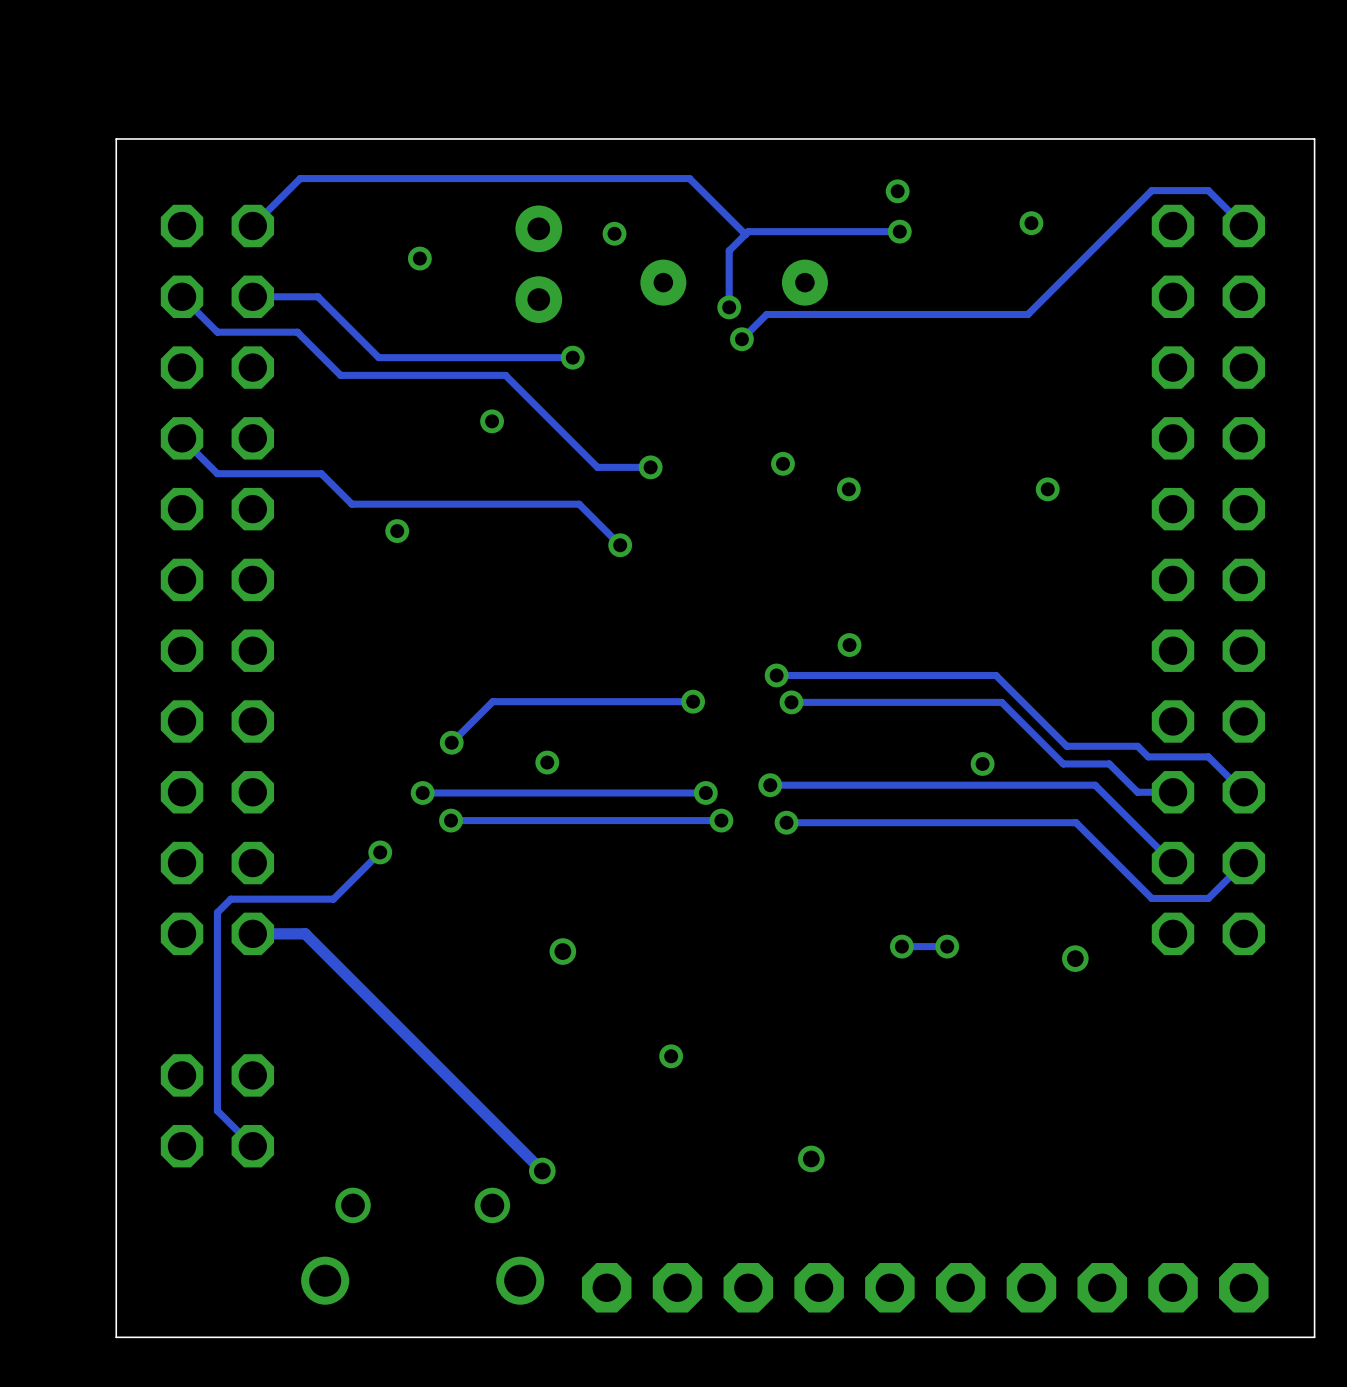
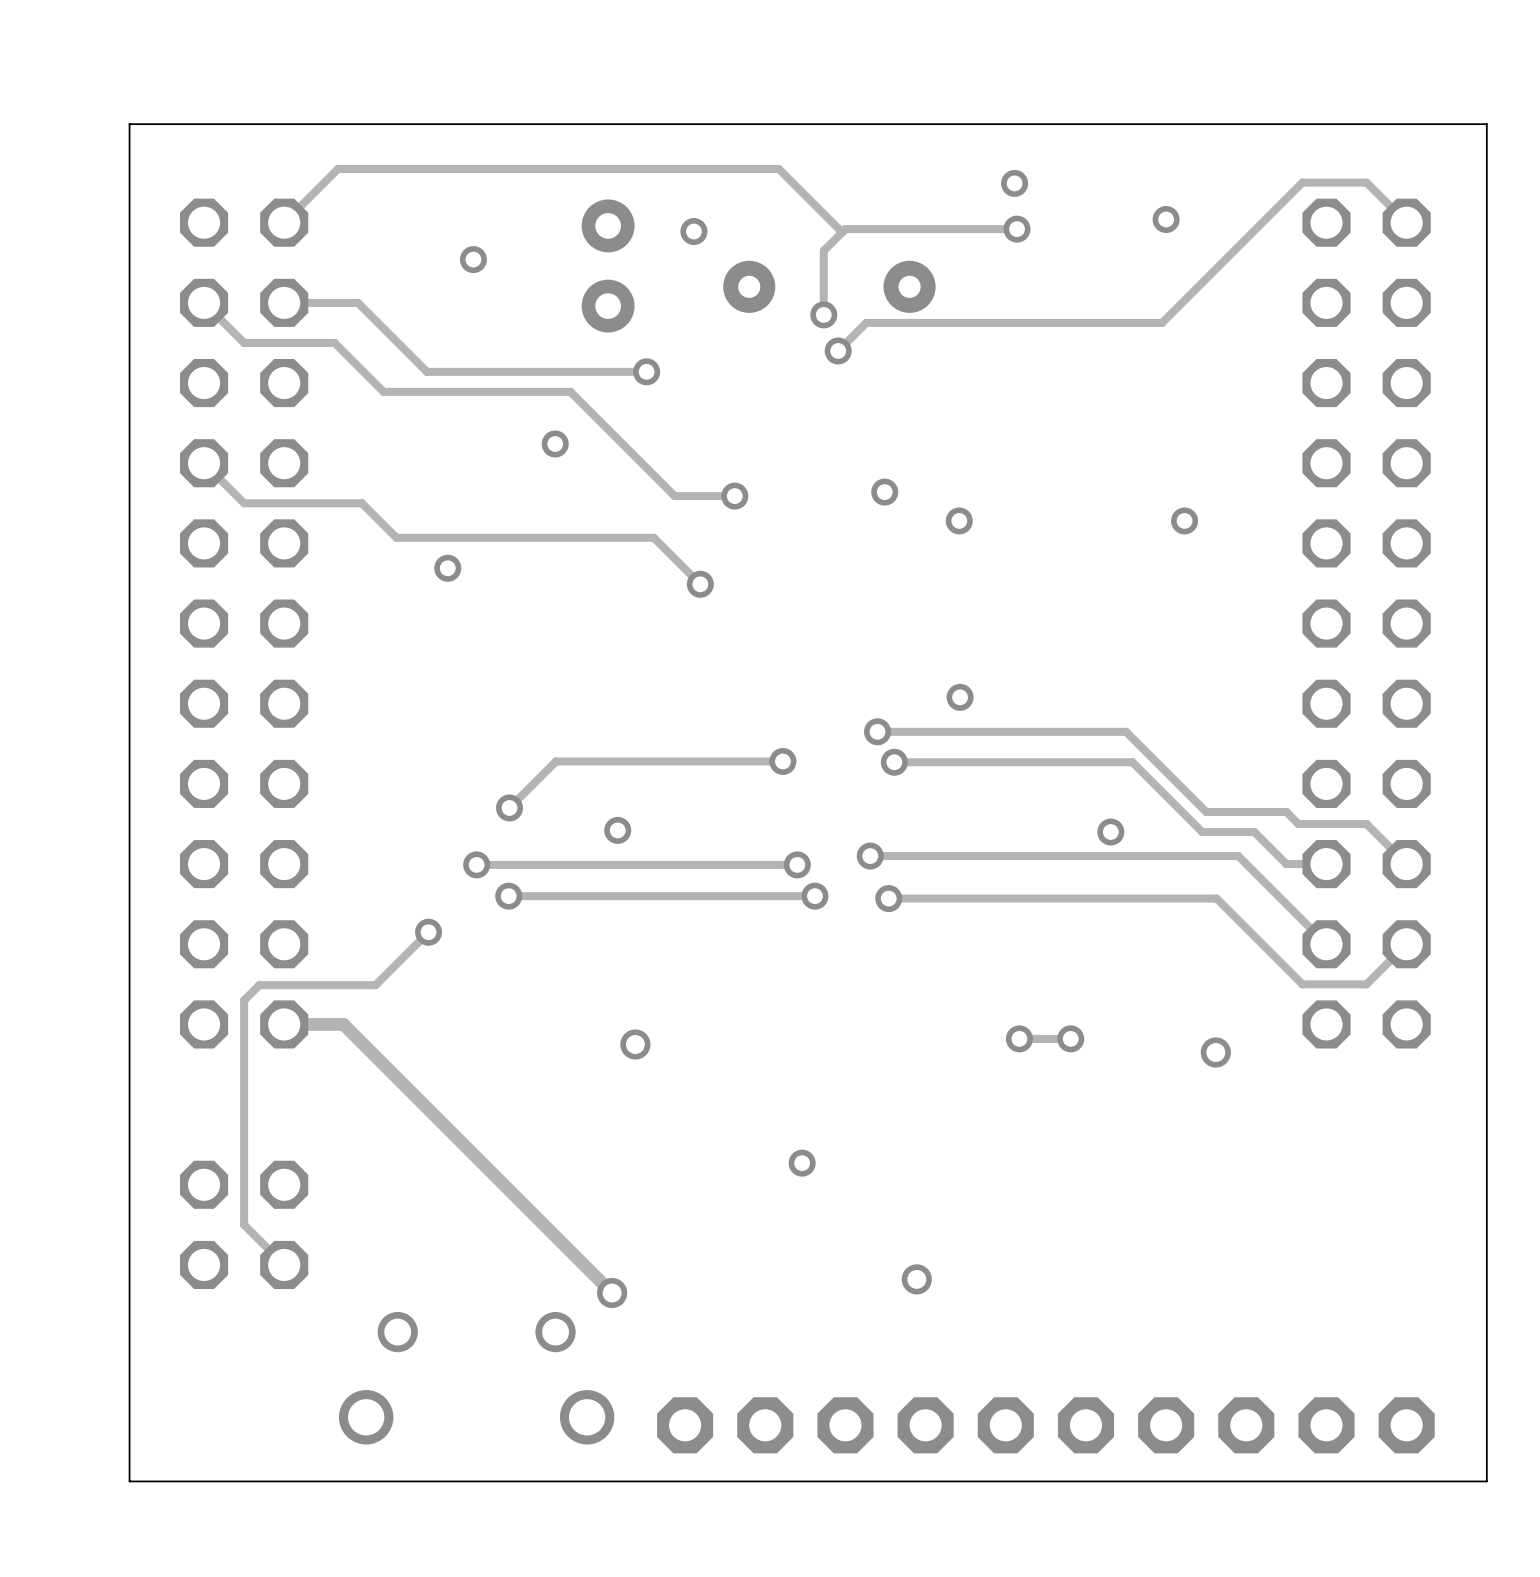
via position: (671, 1056) -> (802, 1163)

